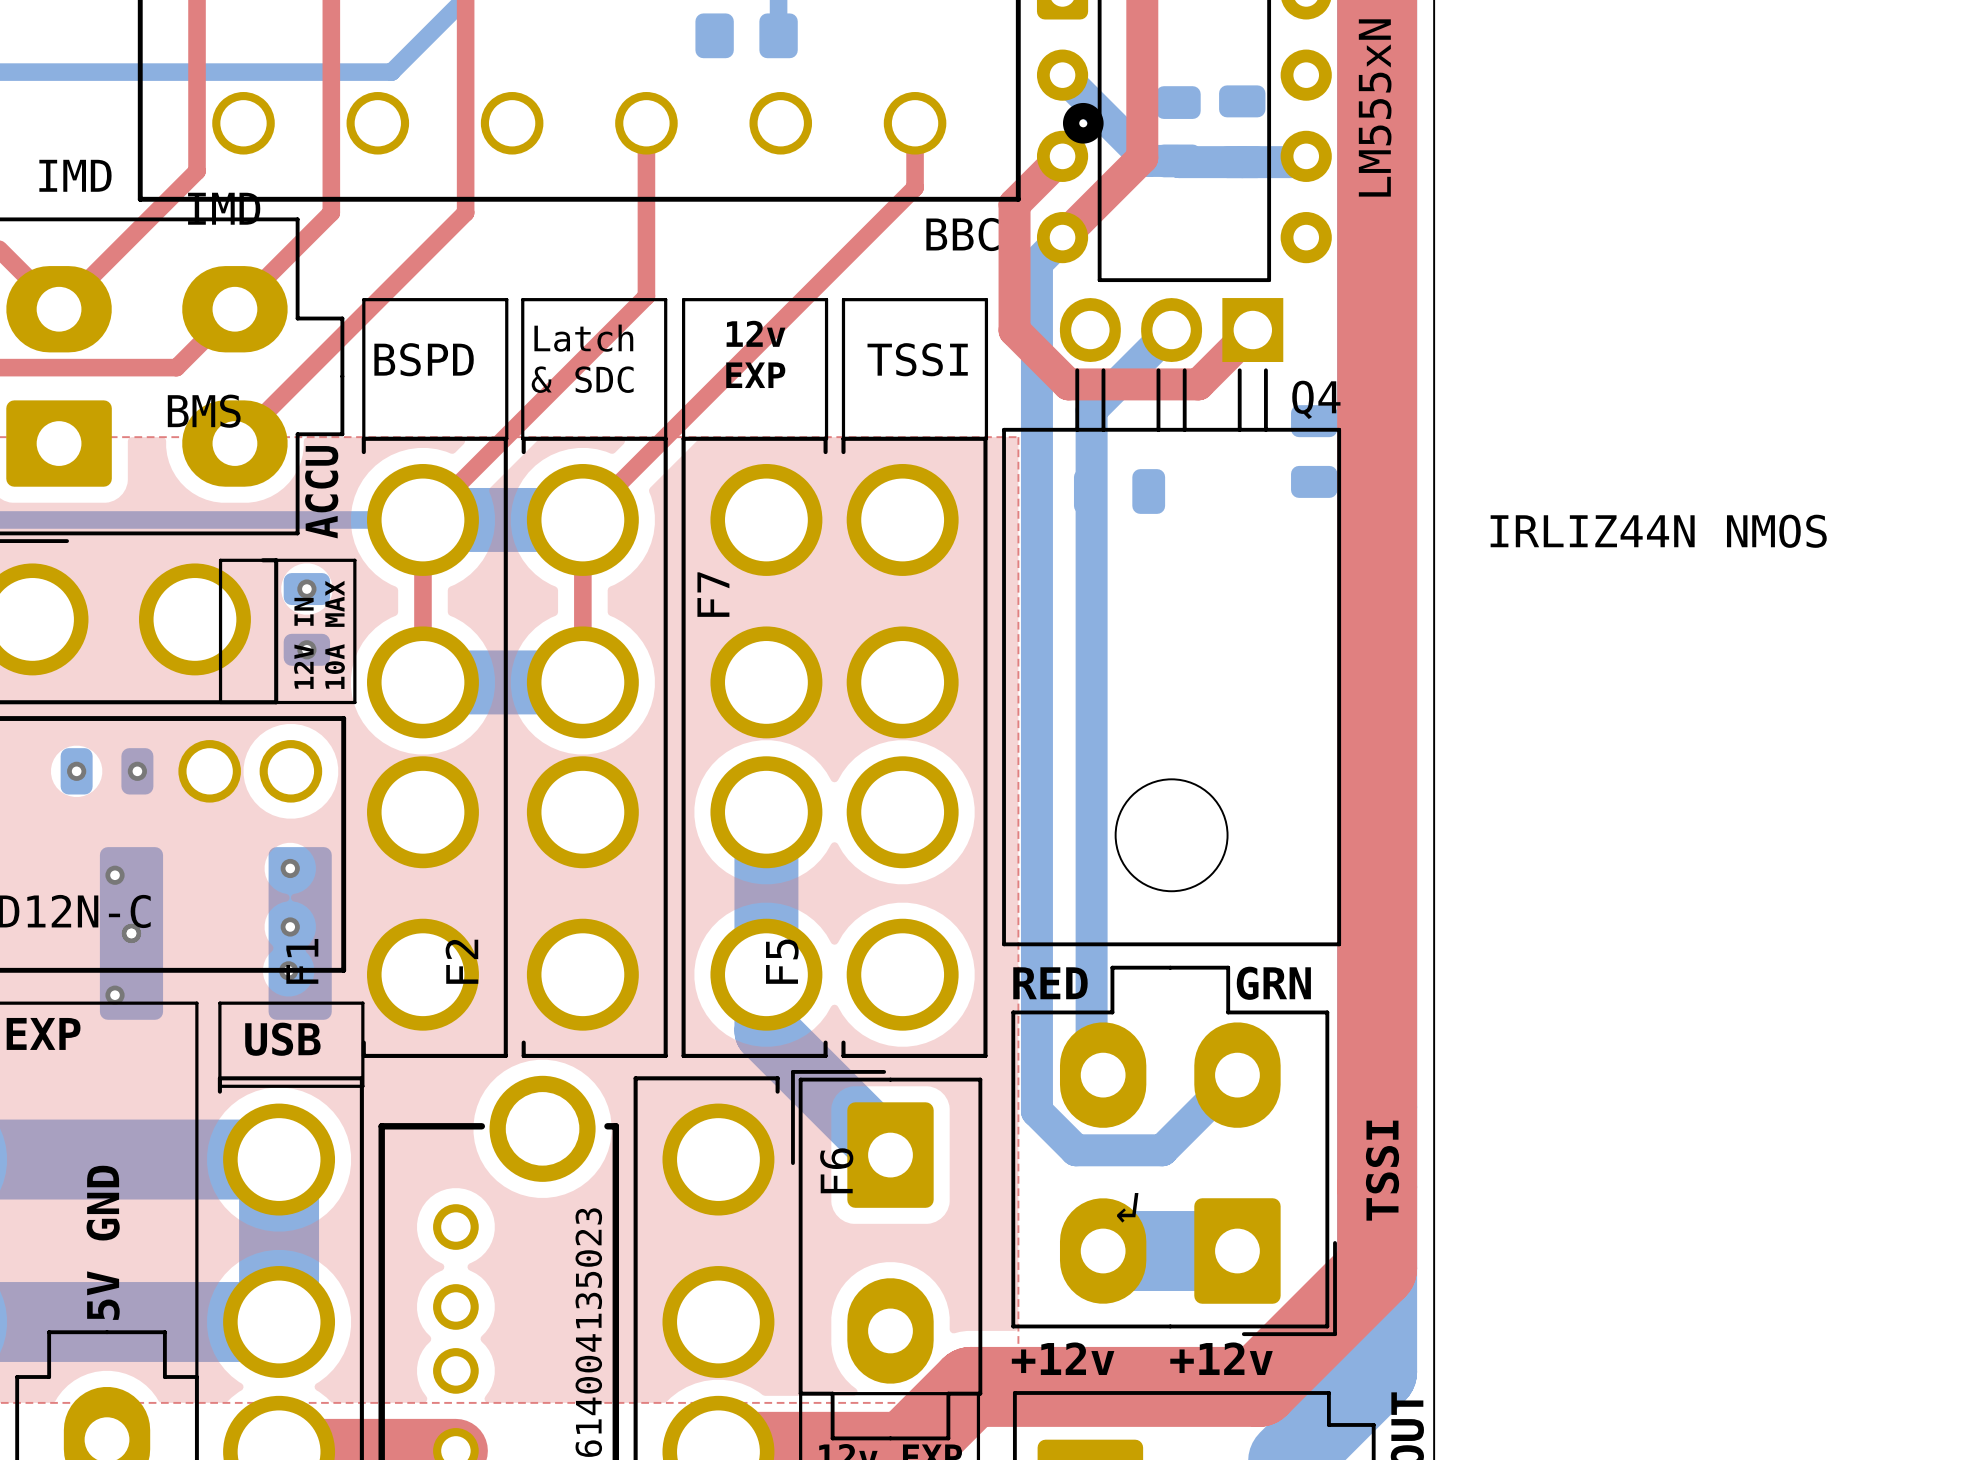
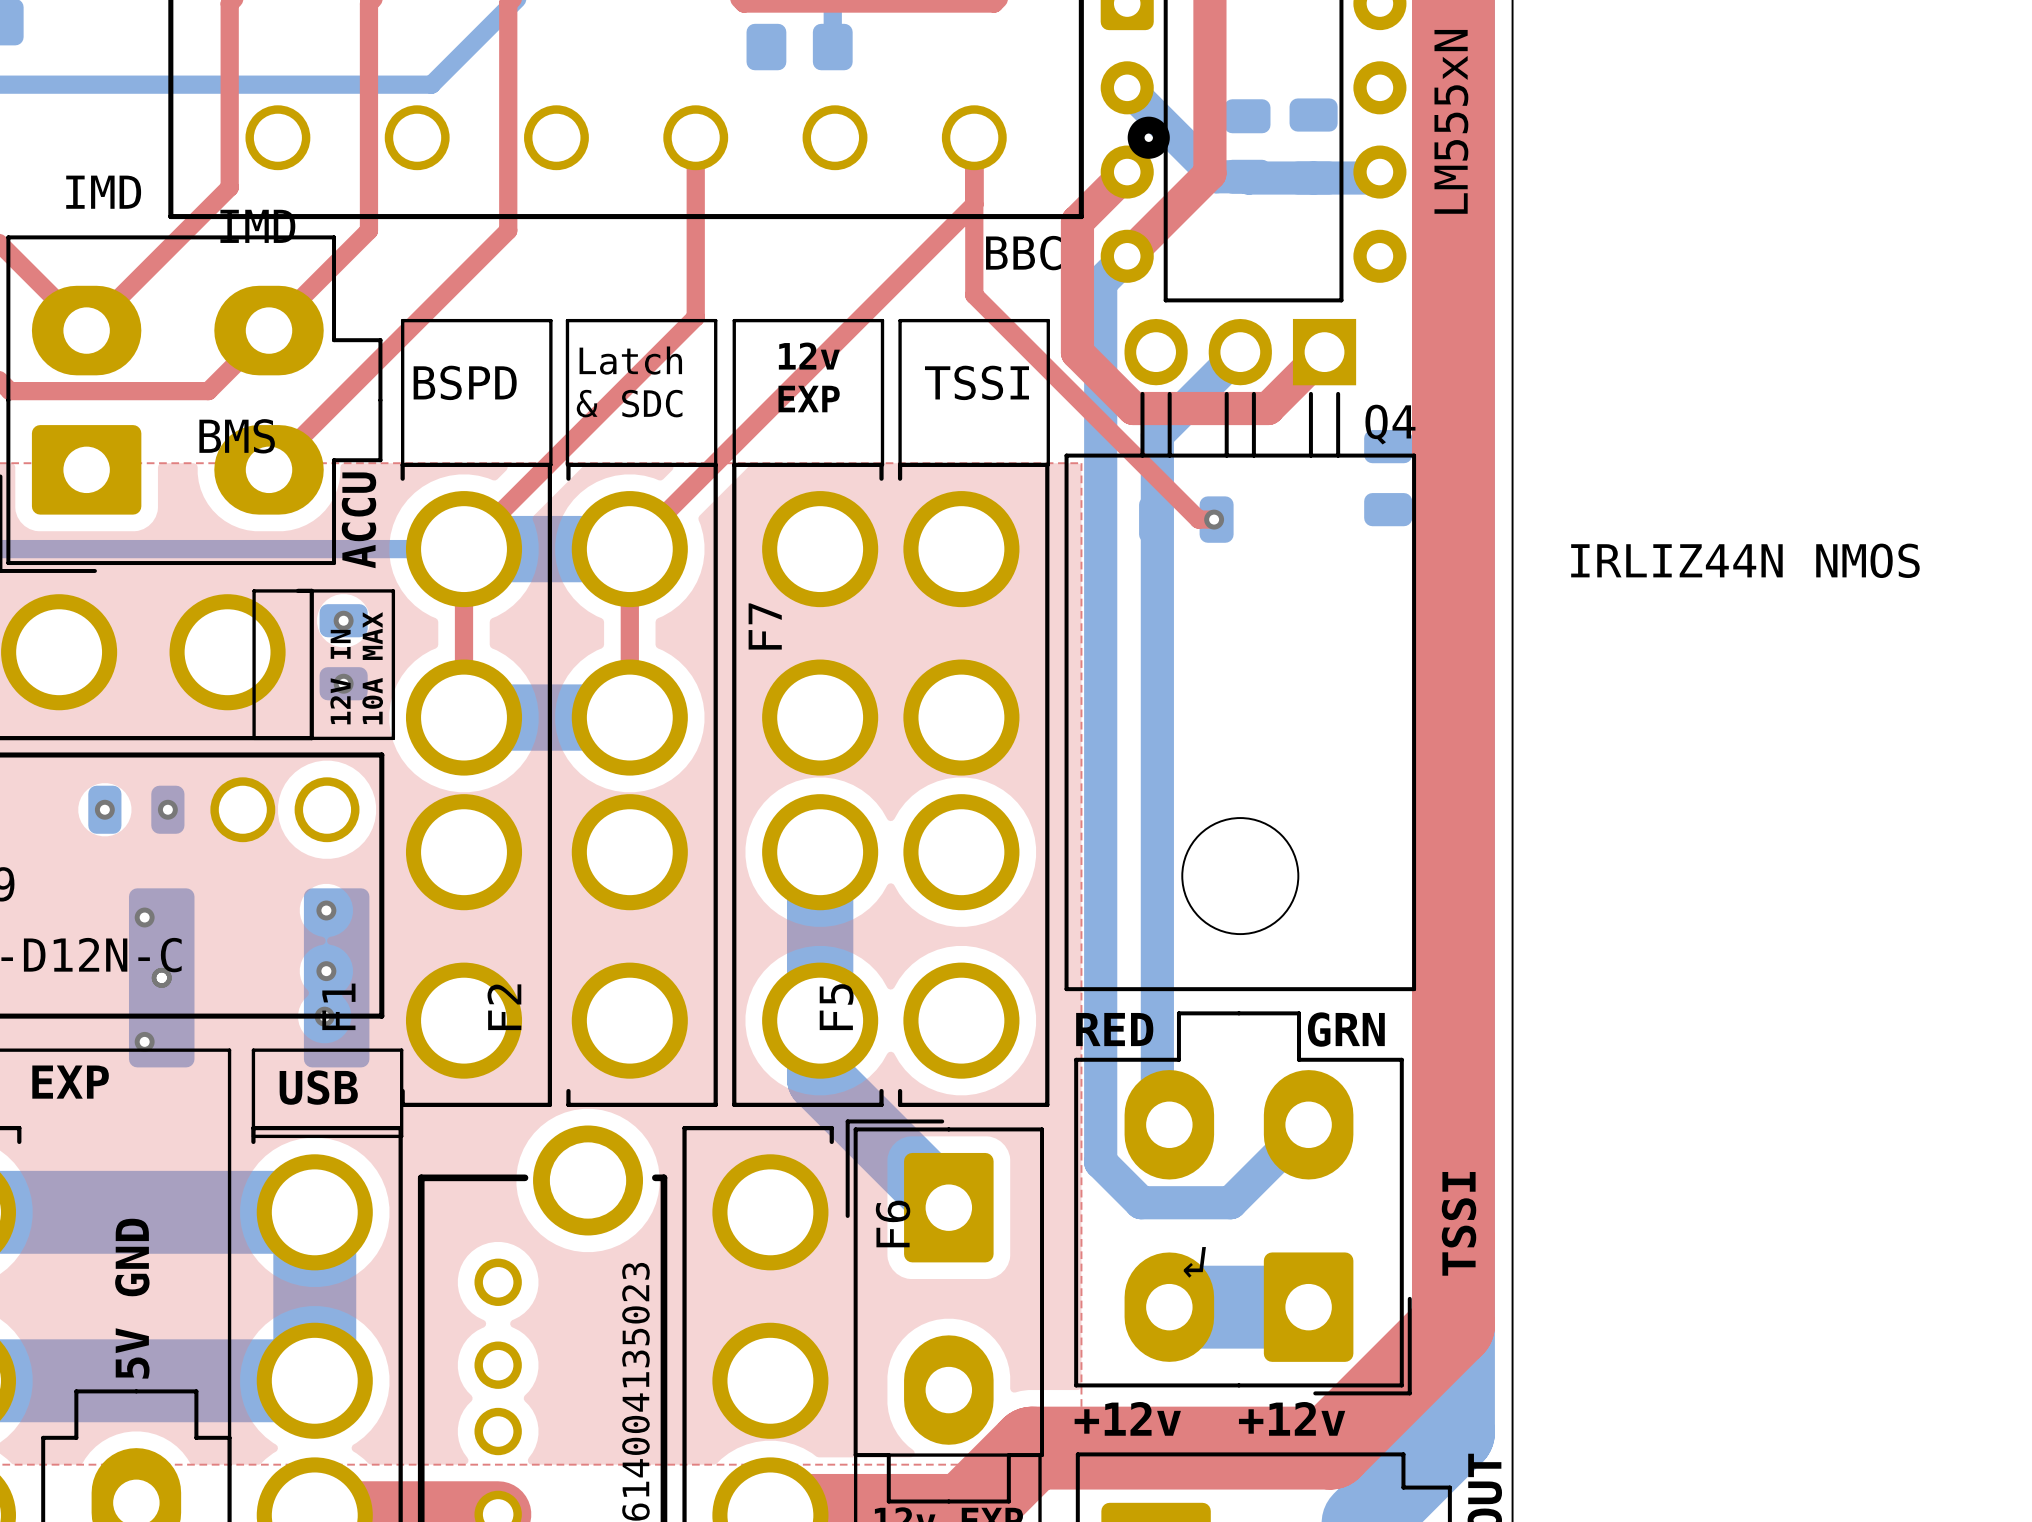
top track: none -> (974, 204) (974, 295) (1198, 519) (1214, 519)
via: none -> (1214, 519)

